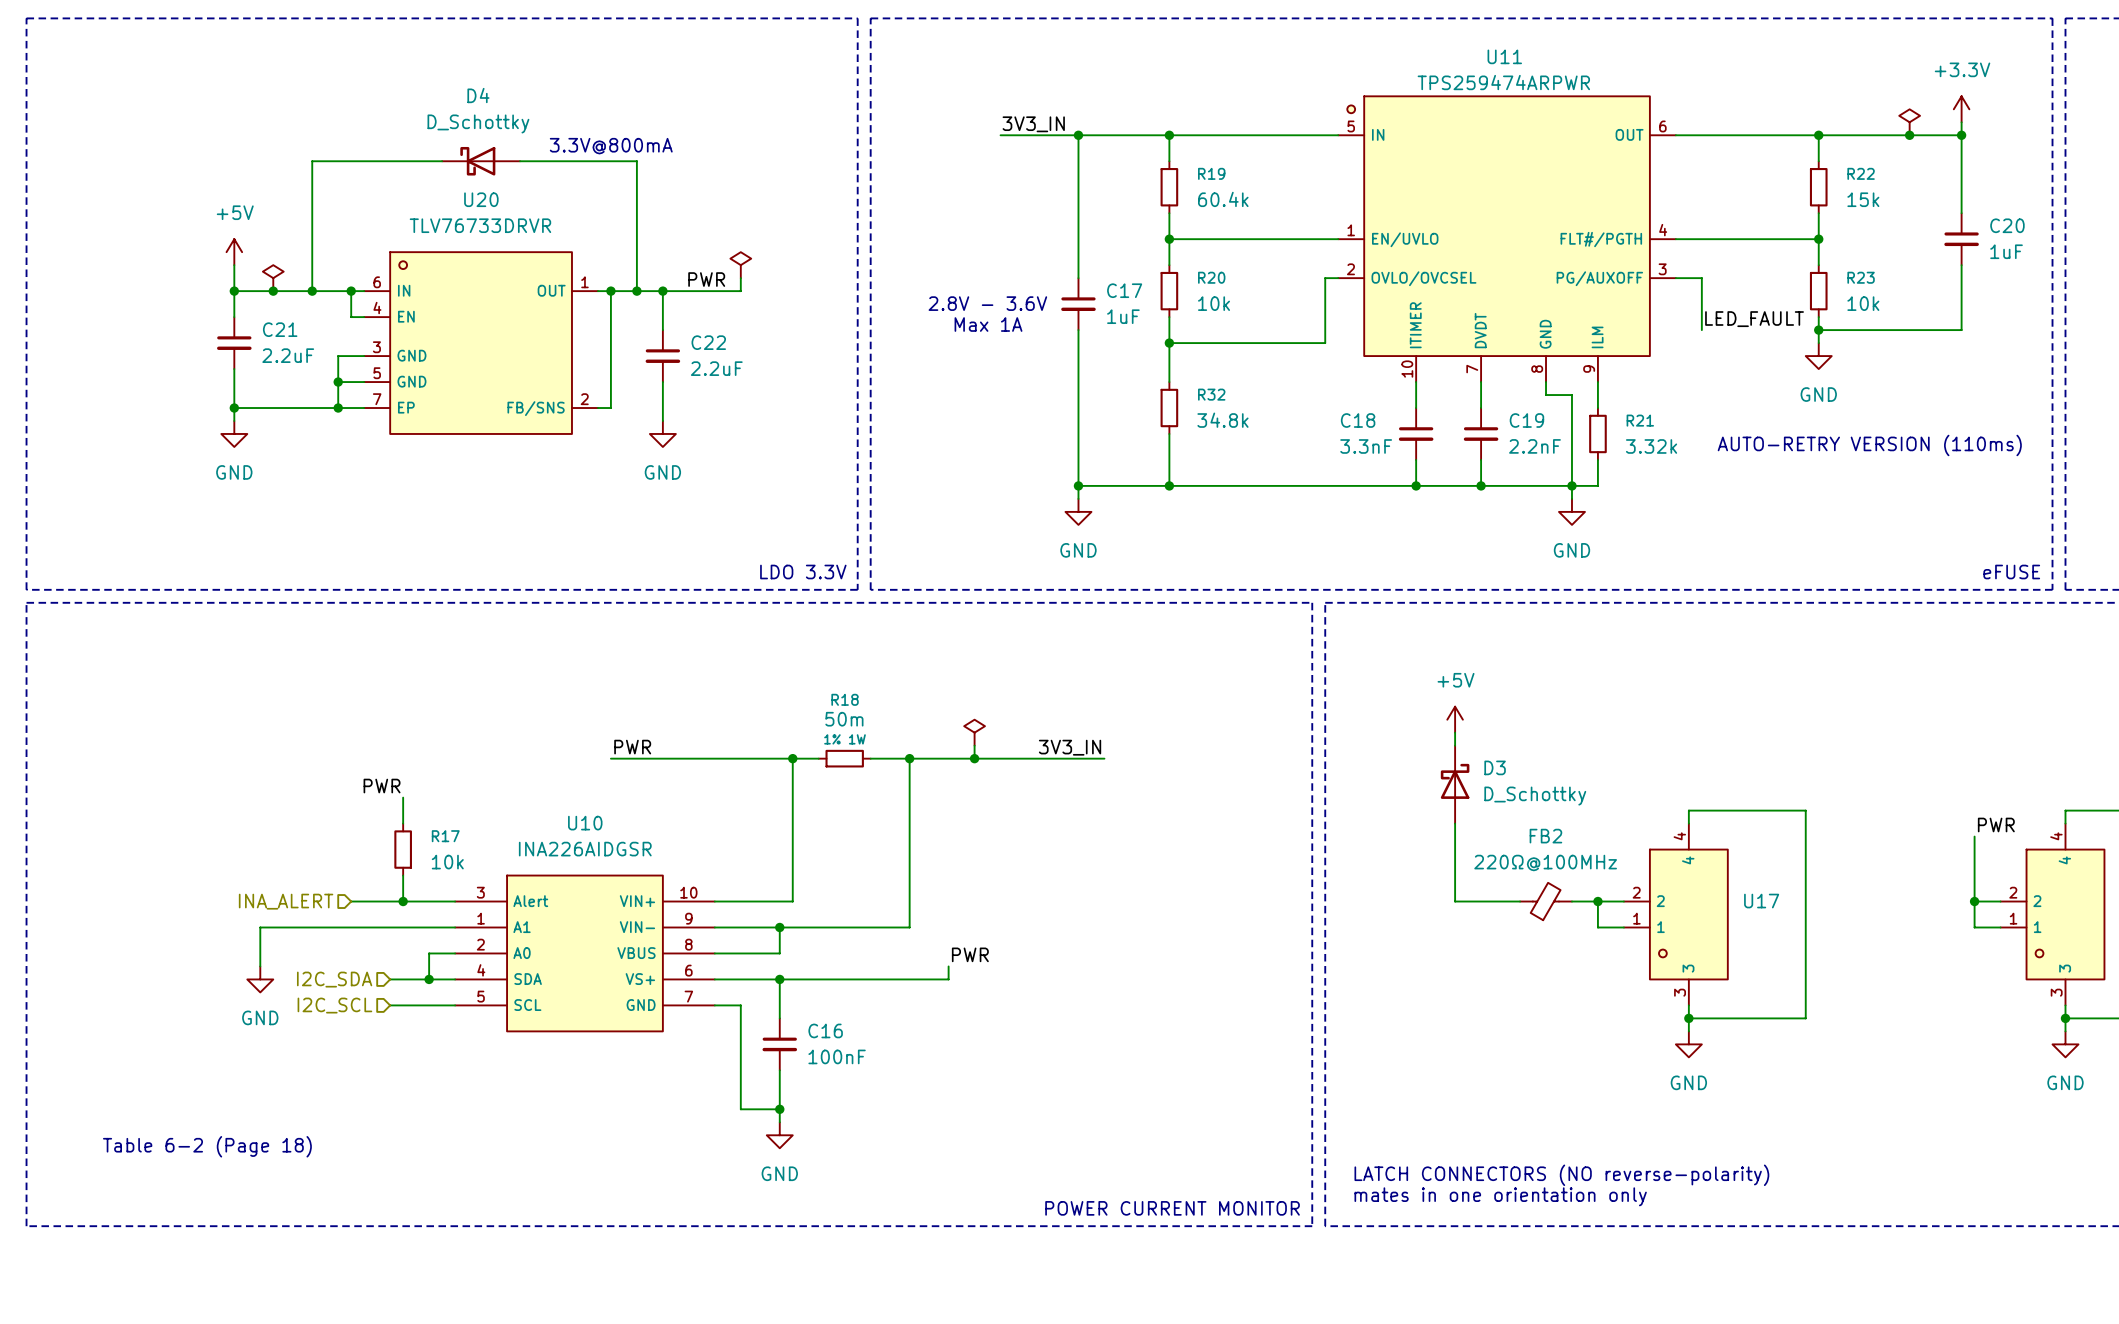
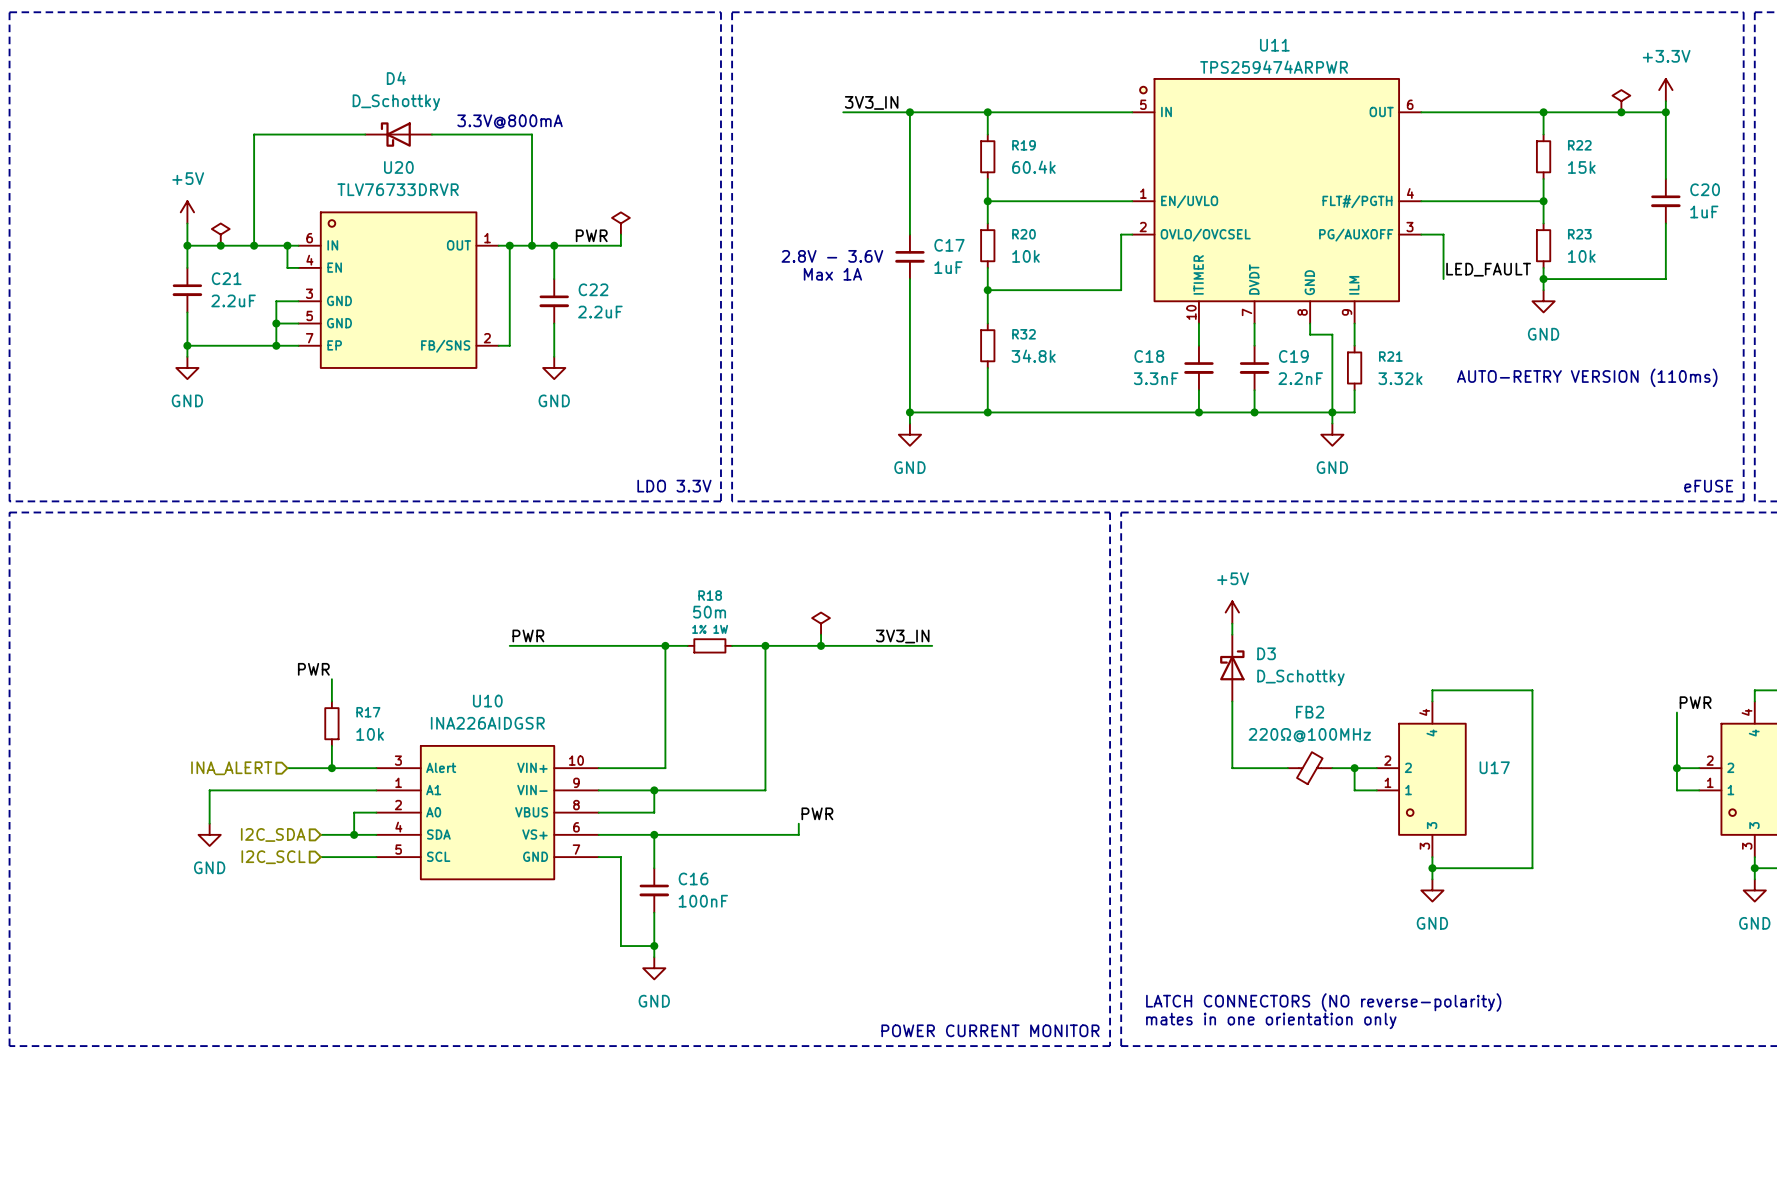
text: Table 6-2 (Page 18) (207, 1146) -> none

